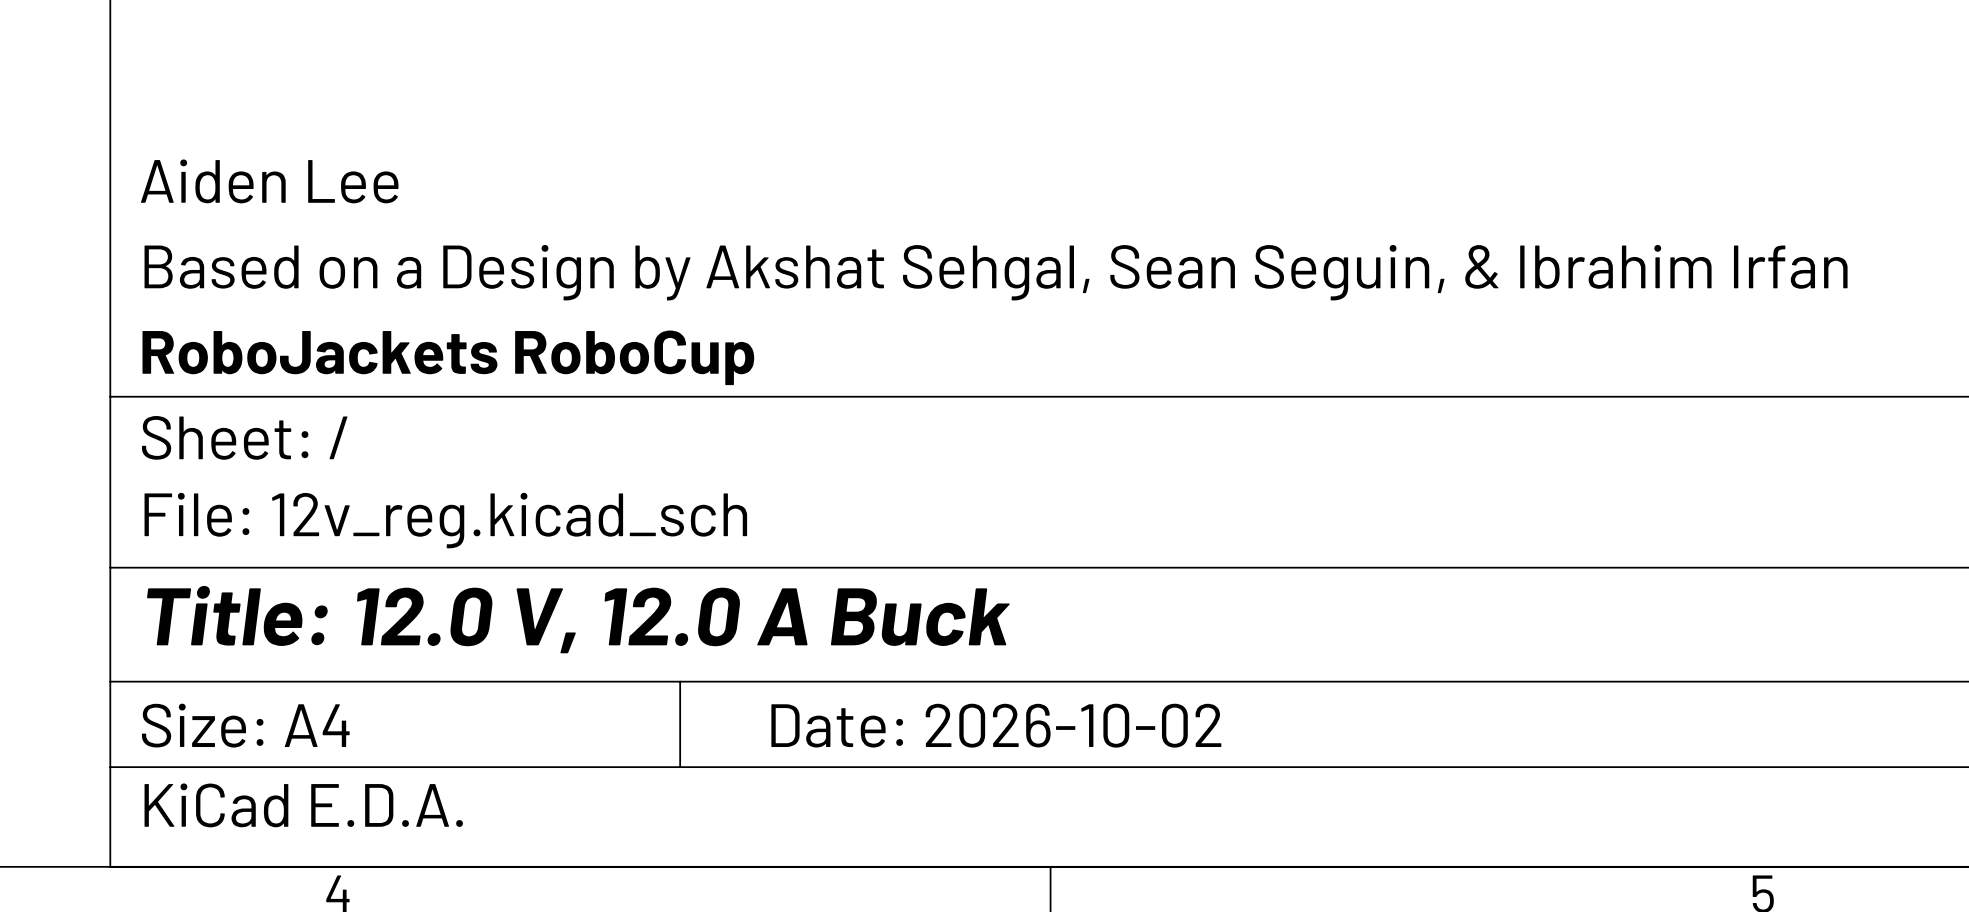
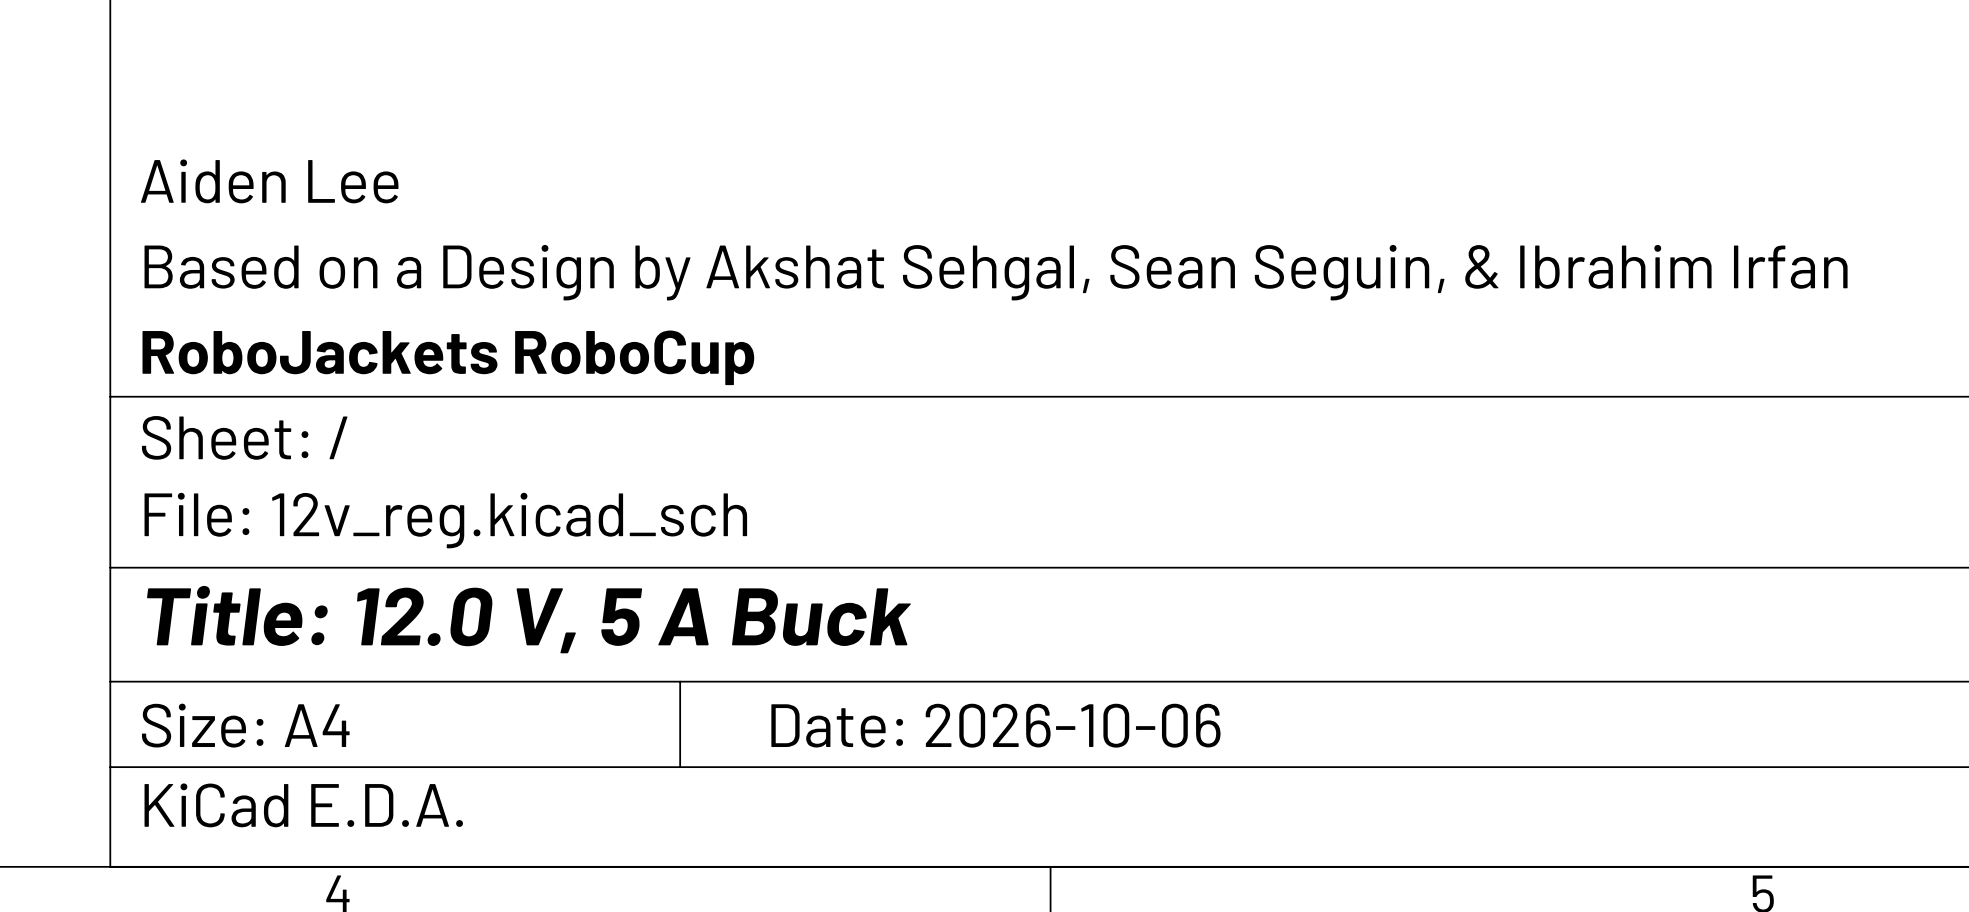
title block: Title: 12.0 V, 12.0 A Buck (578, 619) -> Title: 12.0 V, 5 A Buck (528, 619)
title block: Date: 2026-10-02 (996, 725) -> Date: 2026-10-06 (995, 725)

